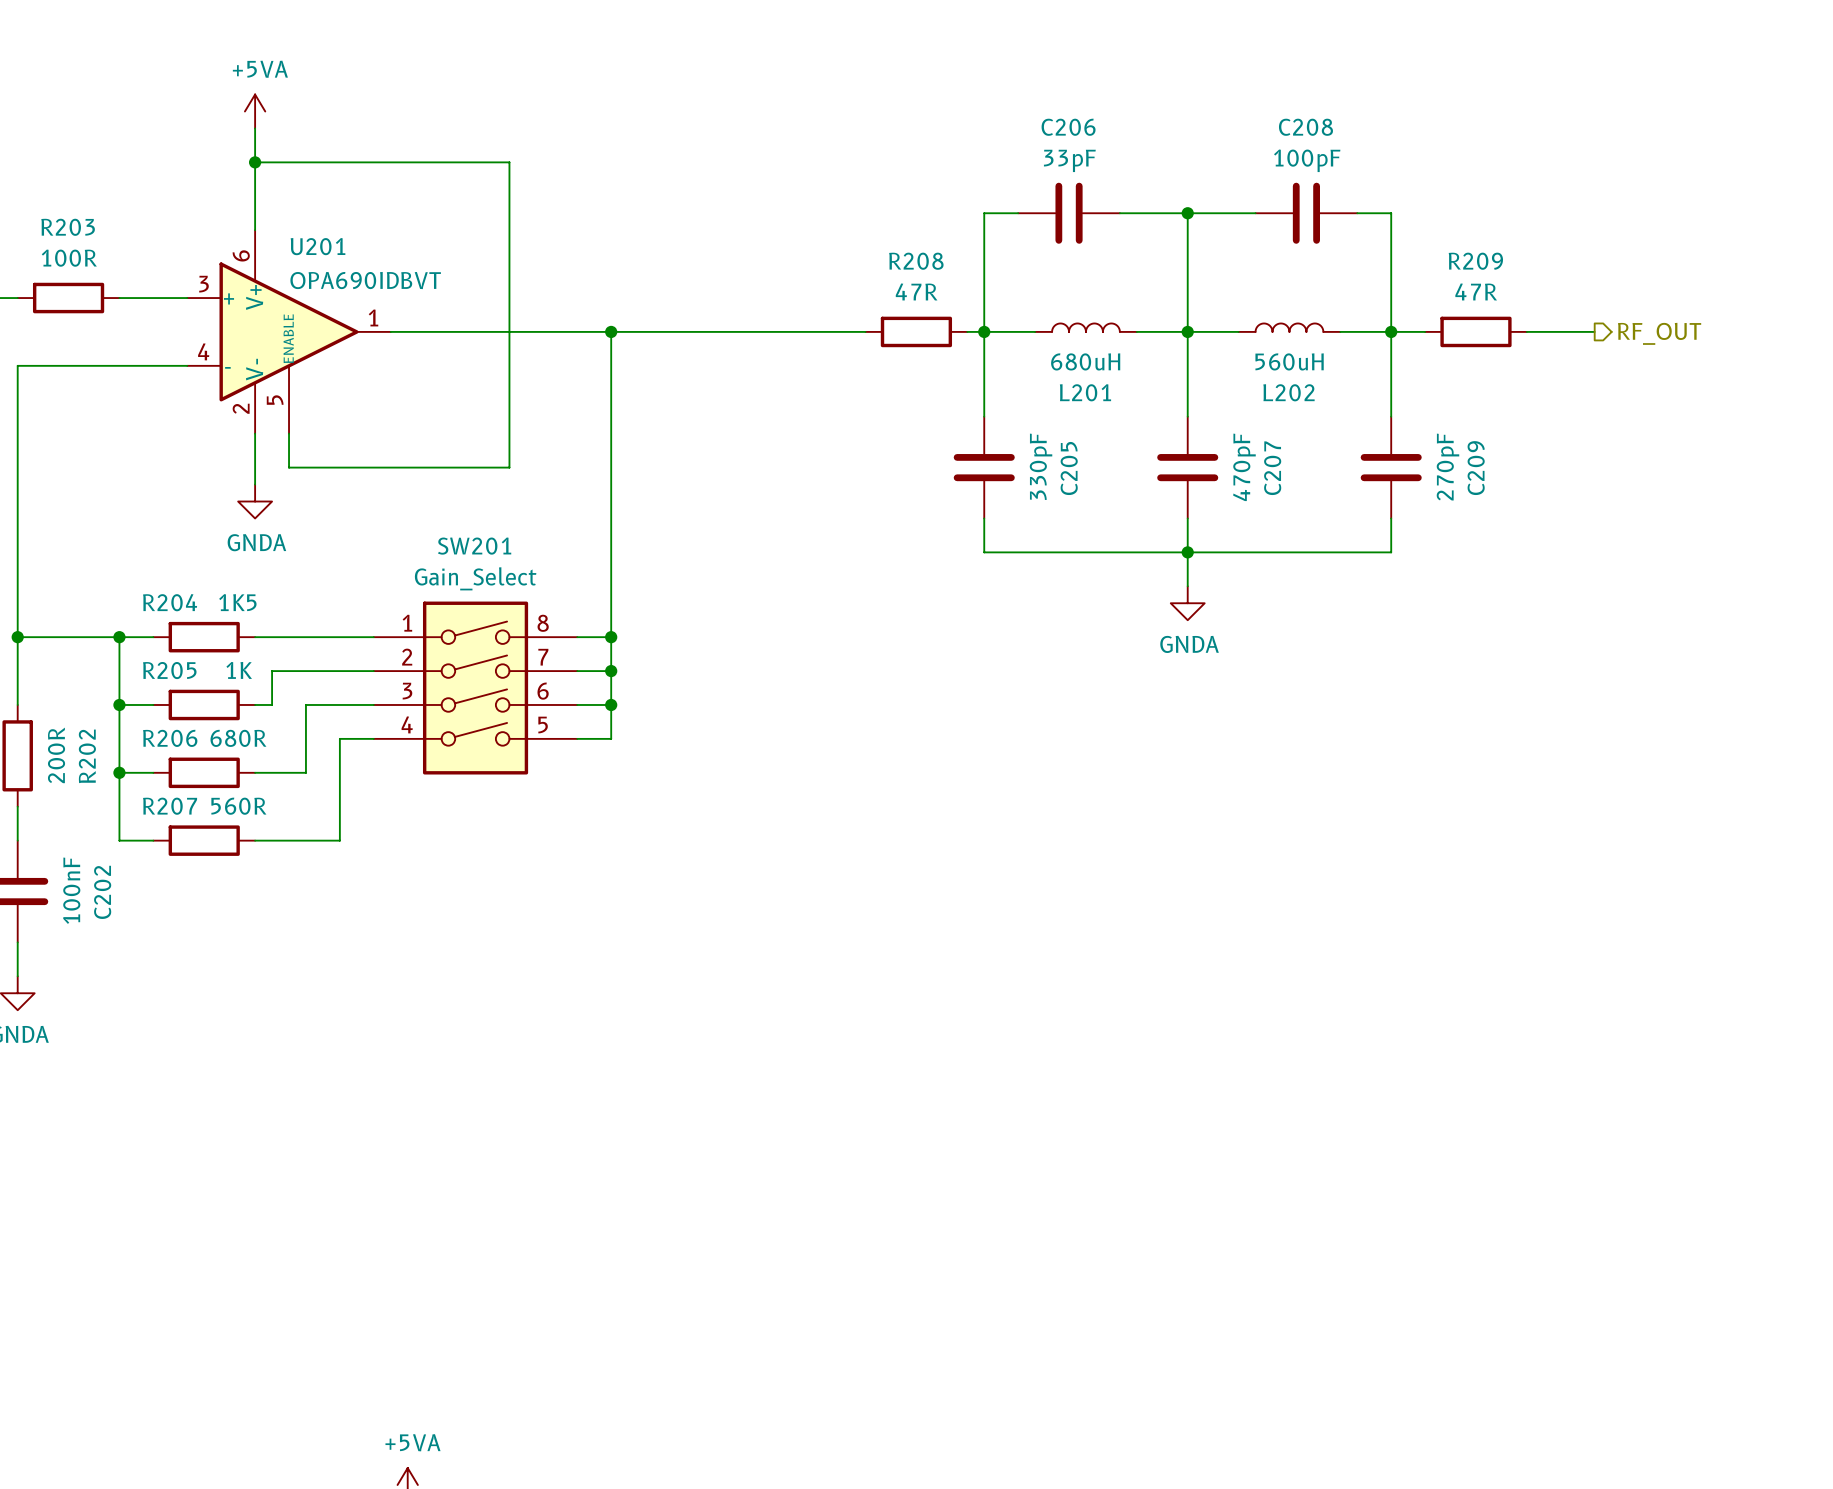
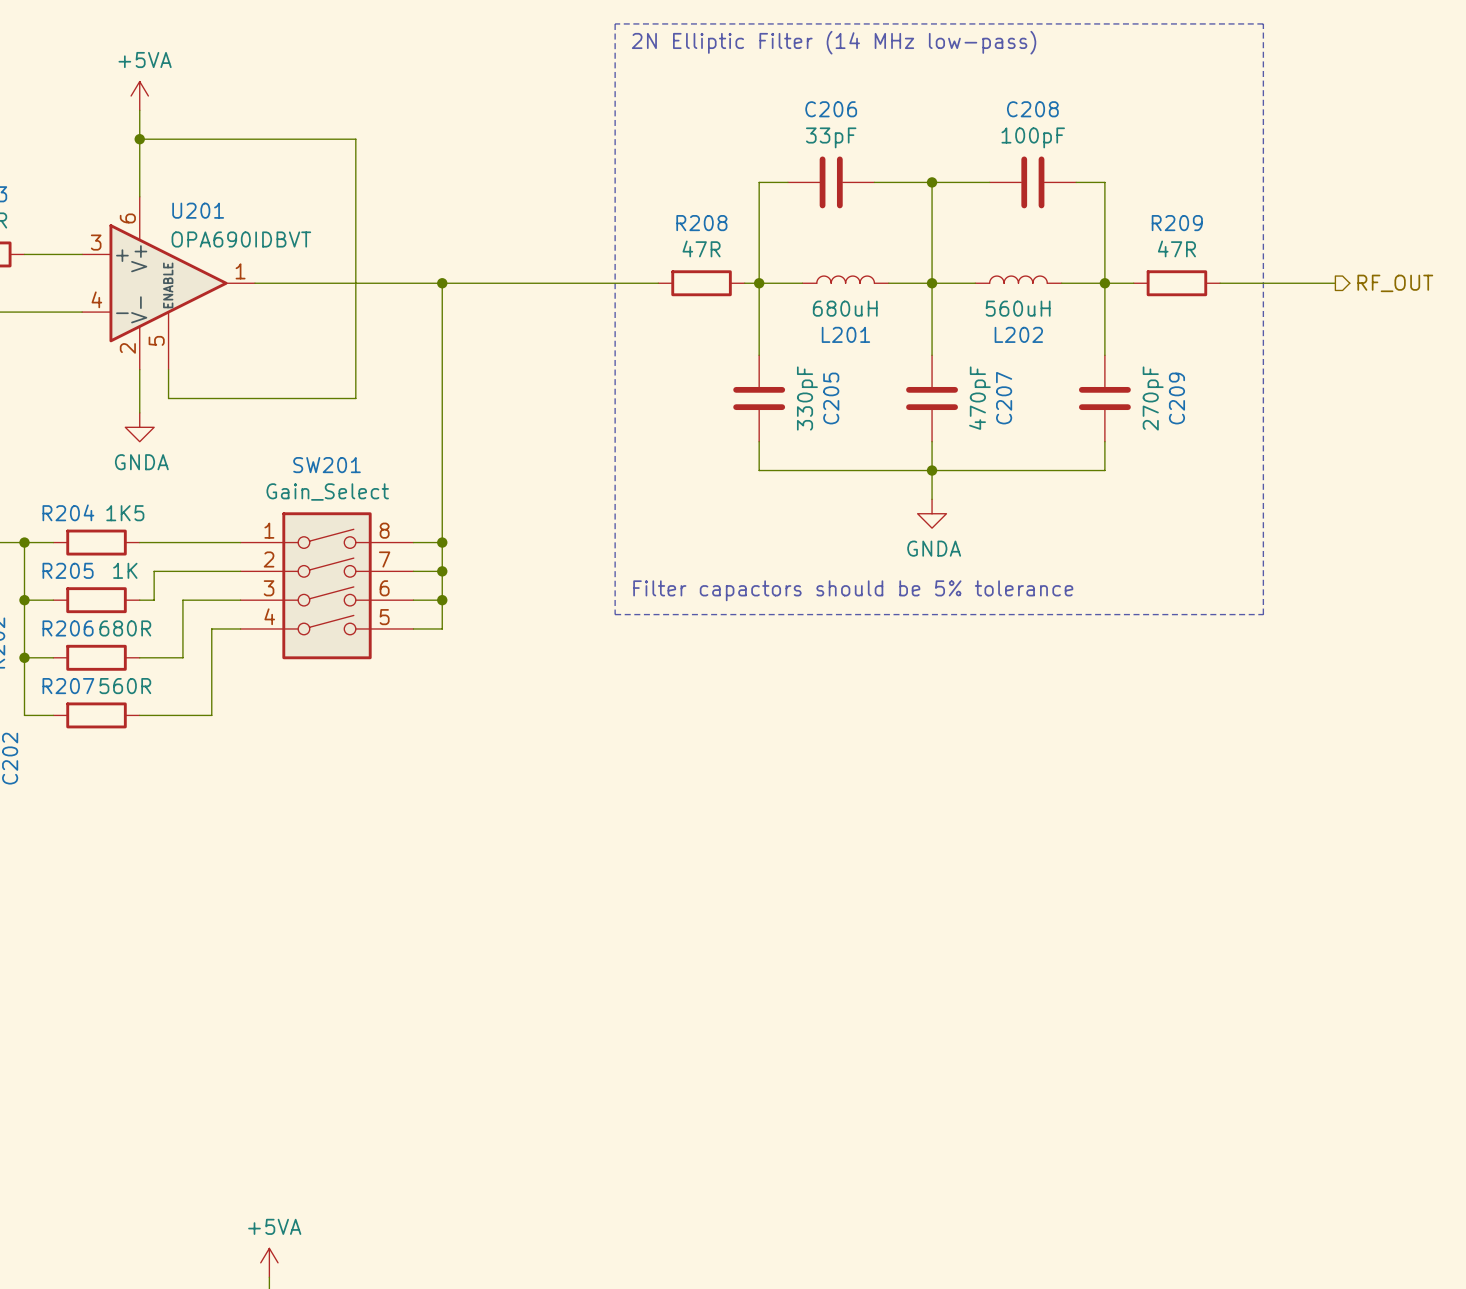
line: none -> (615, 23) (615, 614) (1263, 614) (1263, 23) (615, 23)
text: none -> 2N Elliptic Filter (14 MHz low-pass) (834, 42)
wire: none -> (1277, 283) (1335, 283)
hierarchical label position: RF_OUT (1659, 333) -> RF_OUT (1395, 283)
text: none -> Filter capactors should be 5% tolerance (853, 590)

